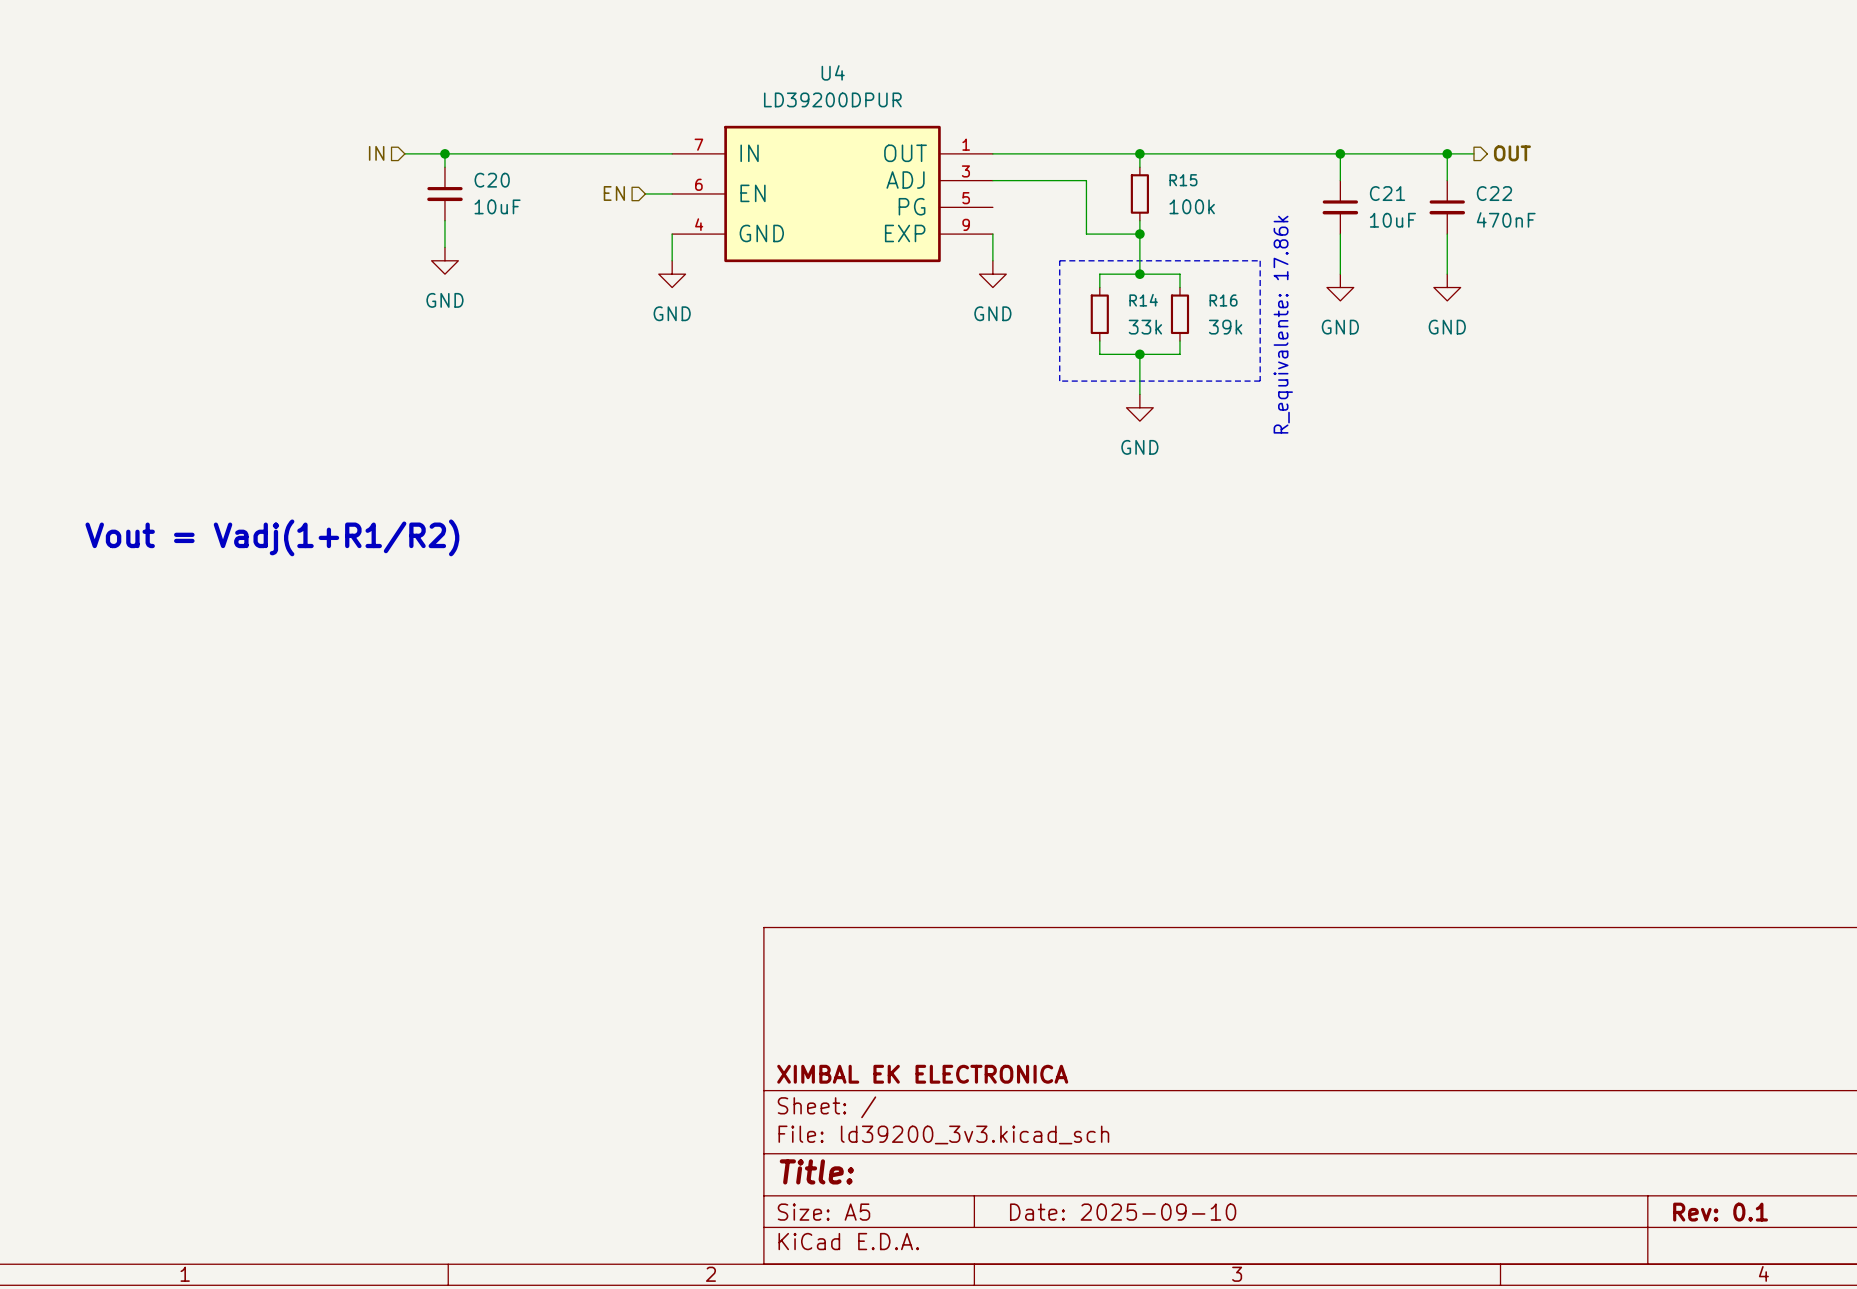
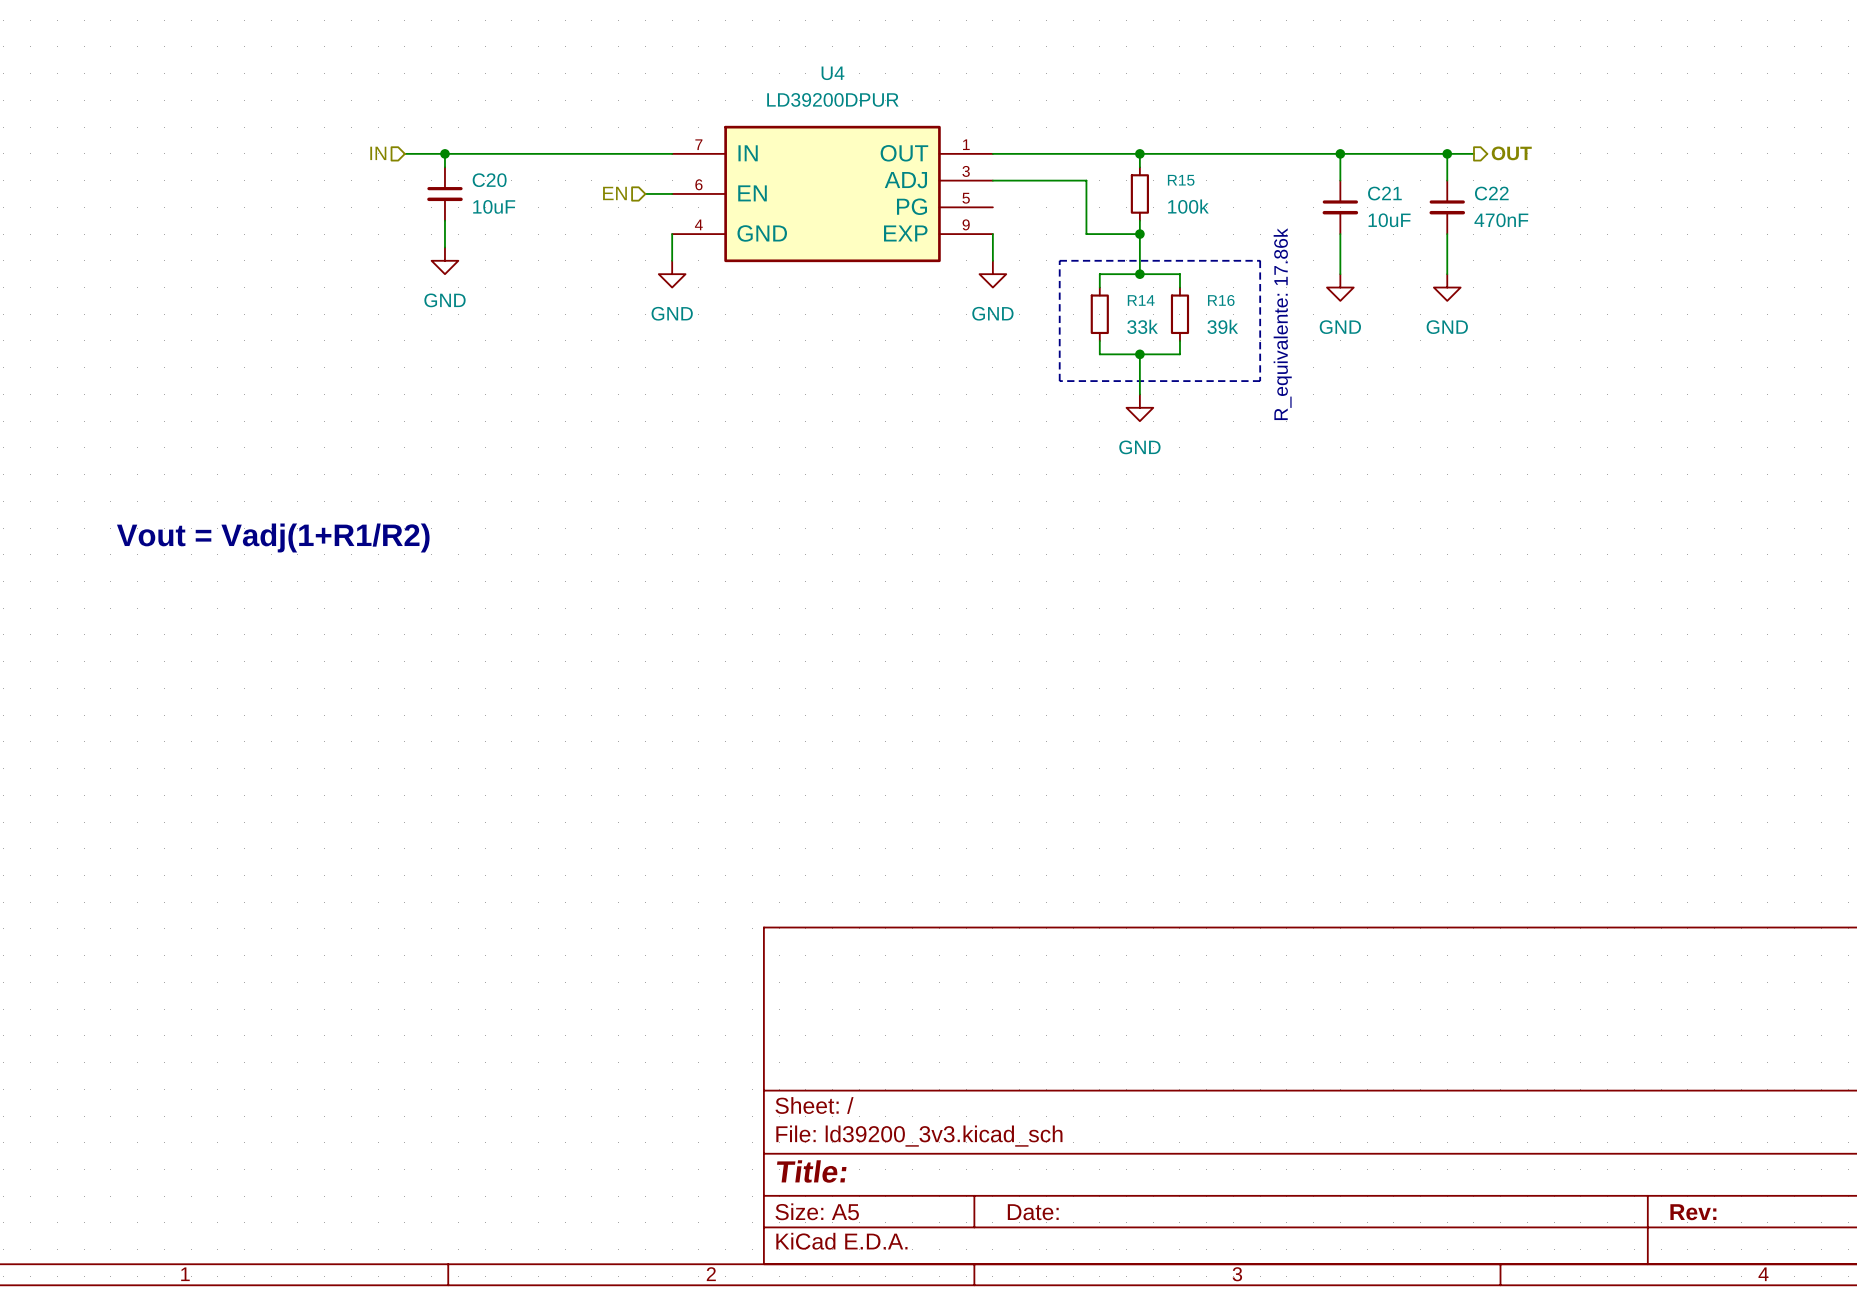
title block: XIMBAL EK ELECTRONICA (922, 1074) -> none
title block: Date: 2025-09-10 (1123, 1212) -> Date: (1033, 1212)
title block: Rev: 0.1 (1720, 1212) -> Rev: (1693, 1212)

